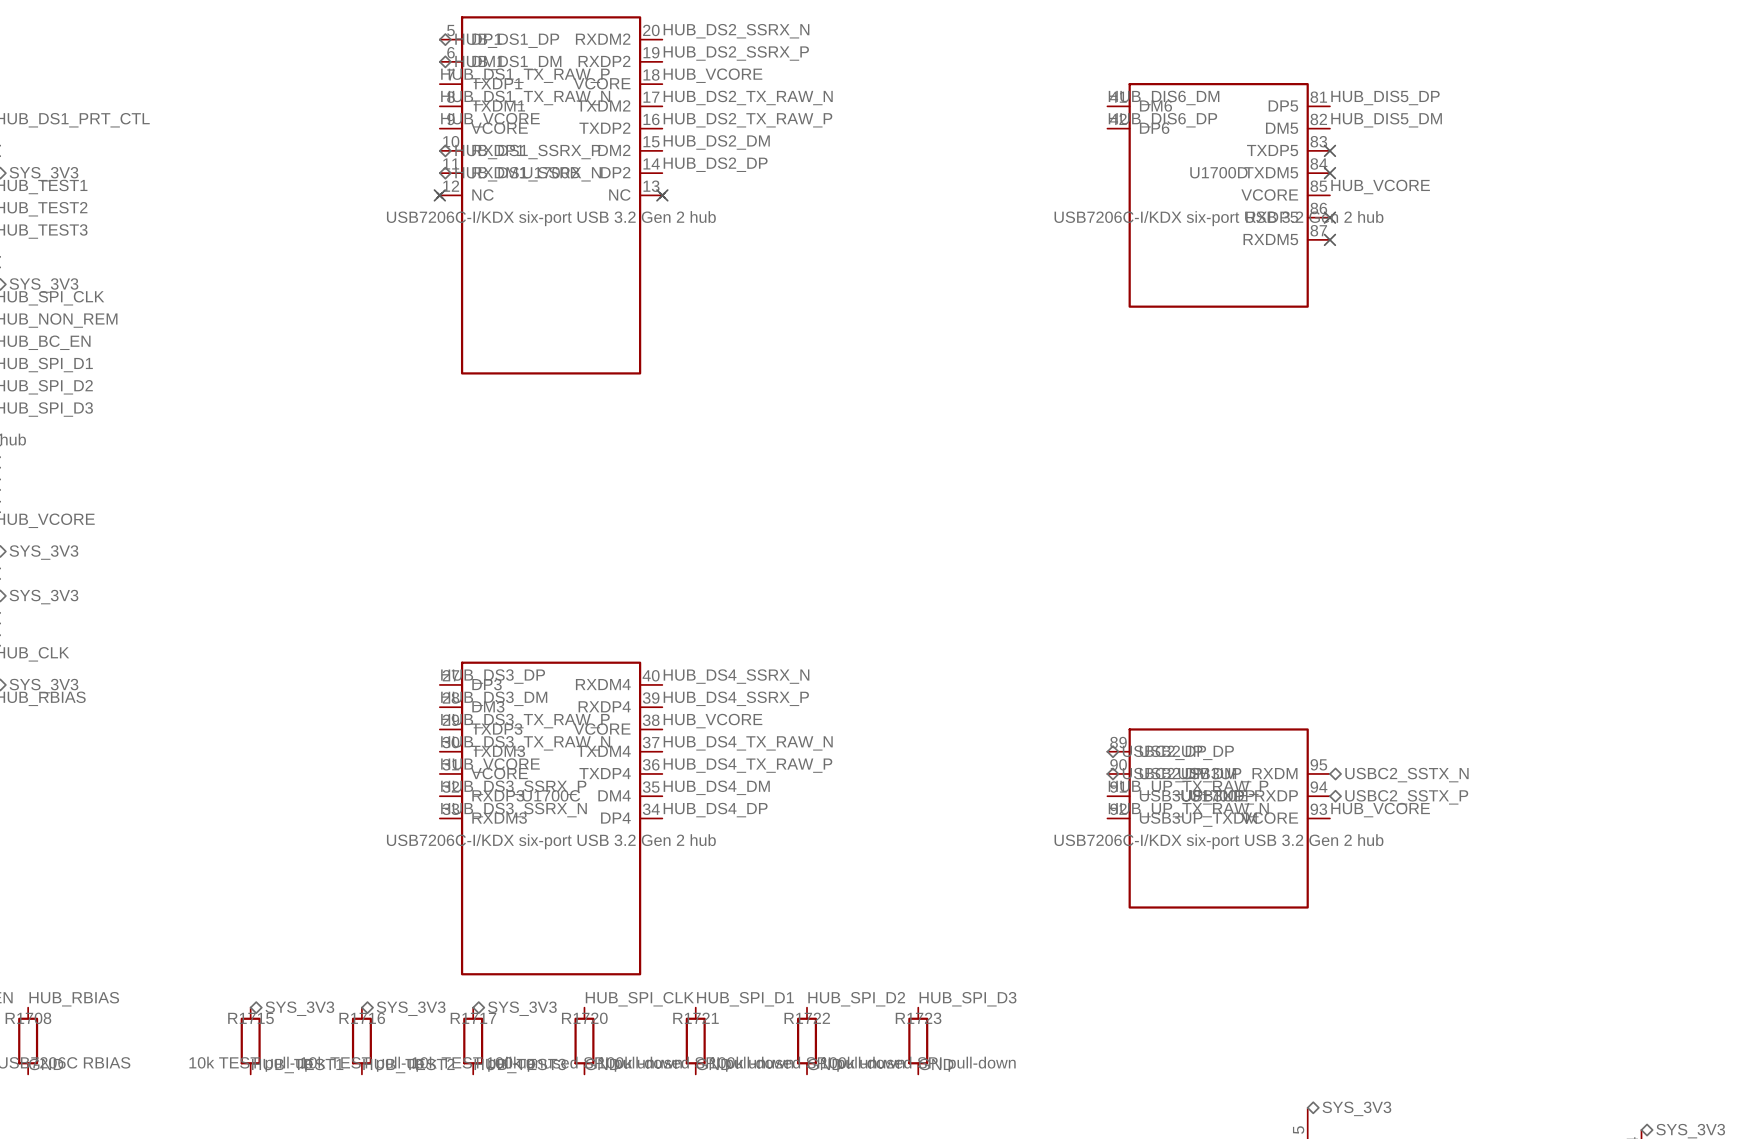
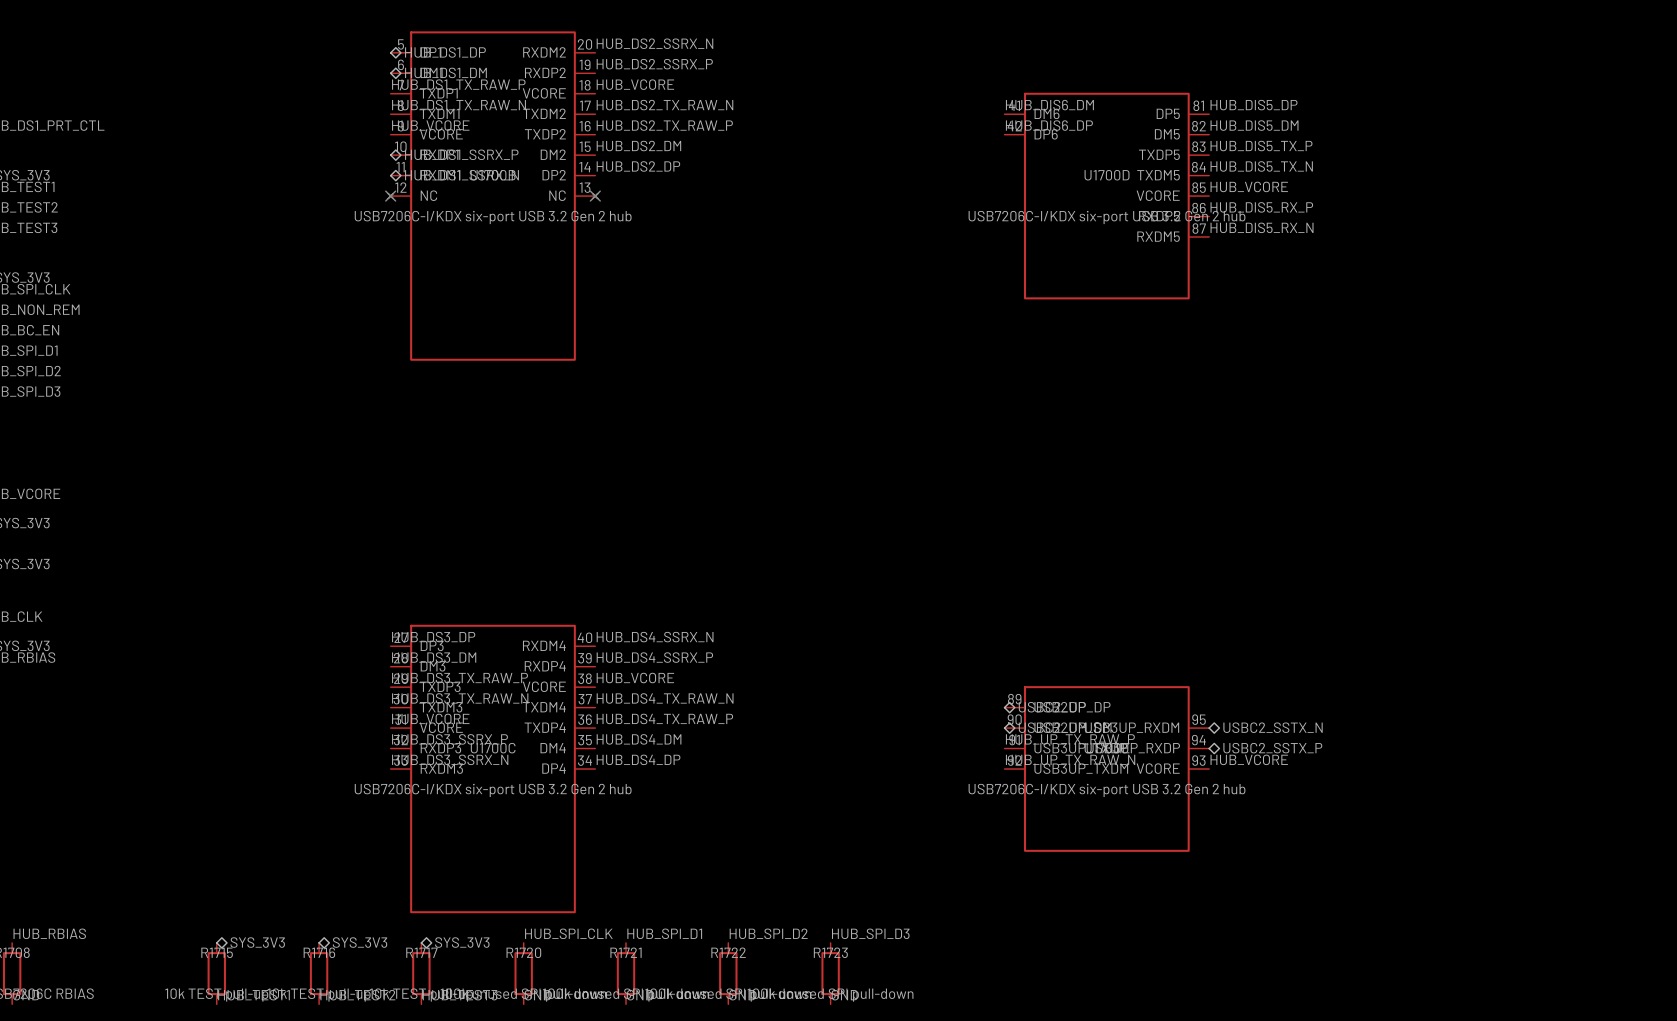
label: none -> HUB_DIS5_TX_P (1261, 146)
no-connect mark: (1329, 150) -> none
label: none -> HUB_DIS5_TX_N (1261, 166)
no-connect mark: (1329, 173) -> none
label: none -> HUB_DIS5_RX_P (1261, 207)
no-connect mark: (1329, 217) -> none
label: none -> HUB_DIS5_RX_N (1262, 227)
no-connect mark: (1329, 239) -> none

